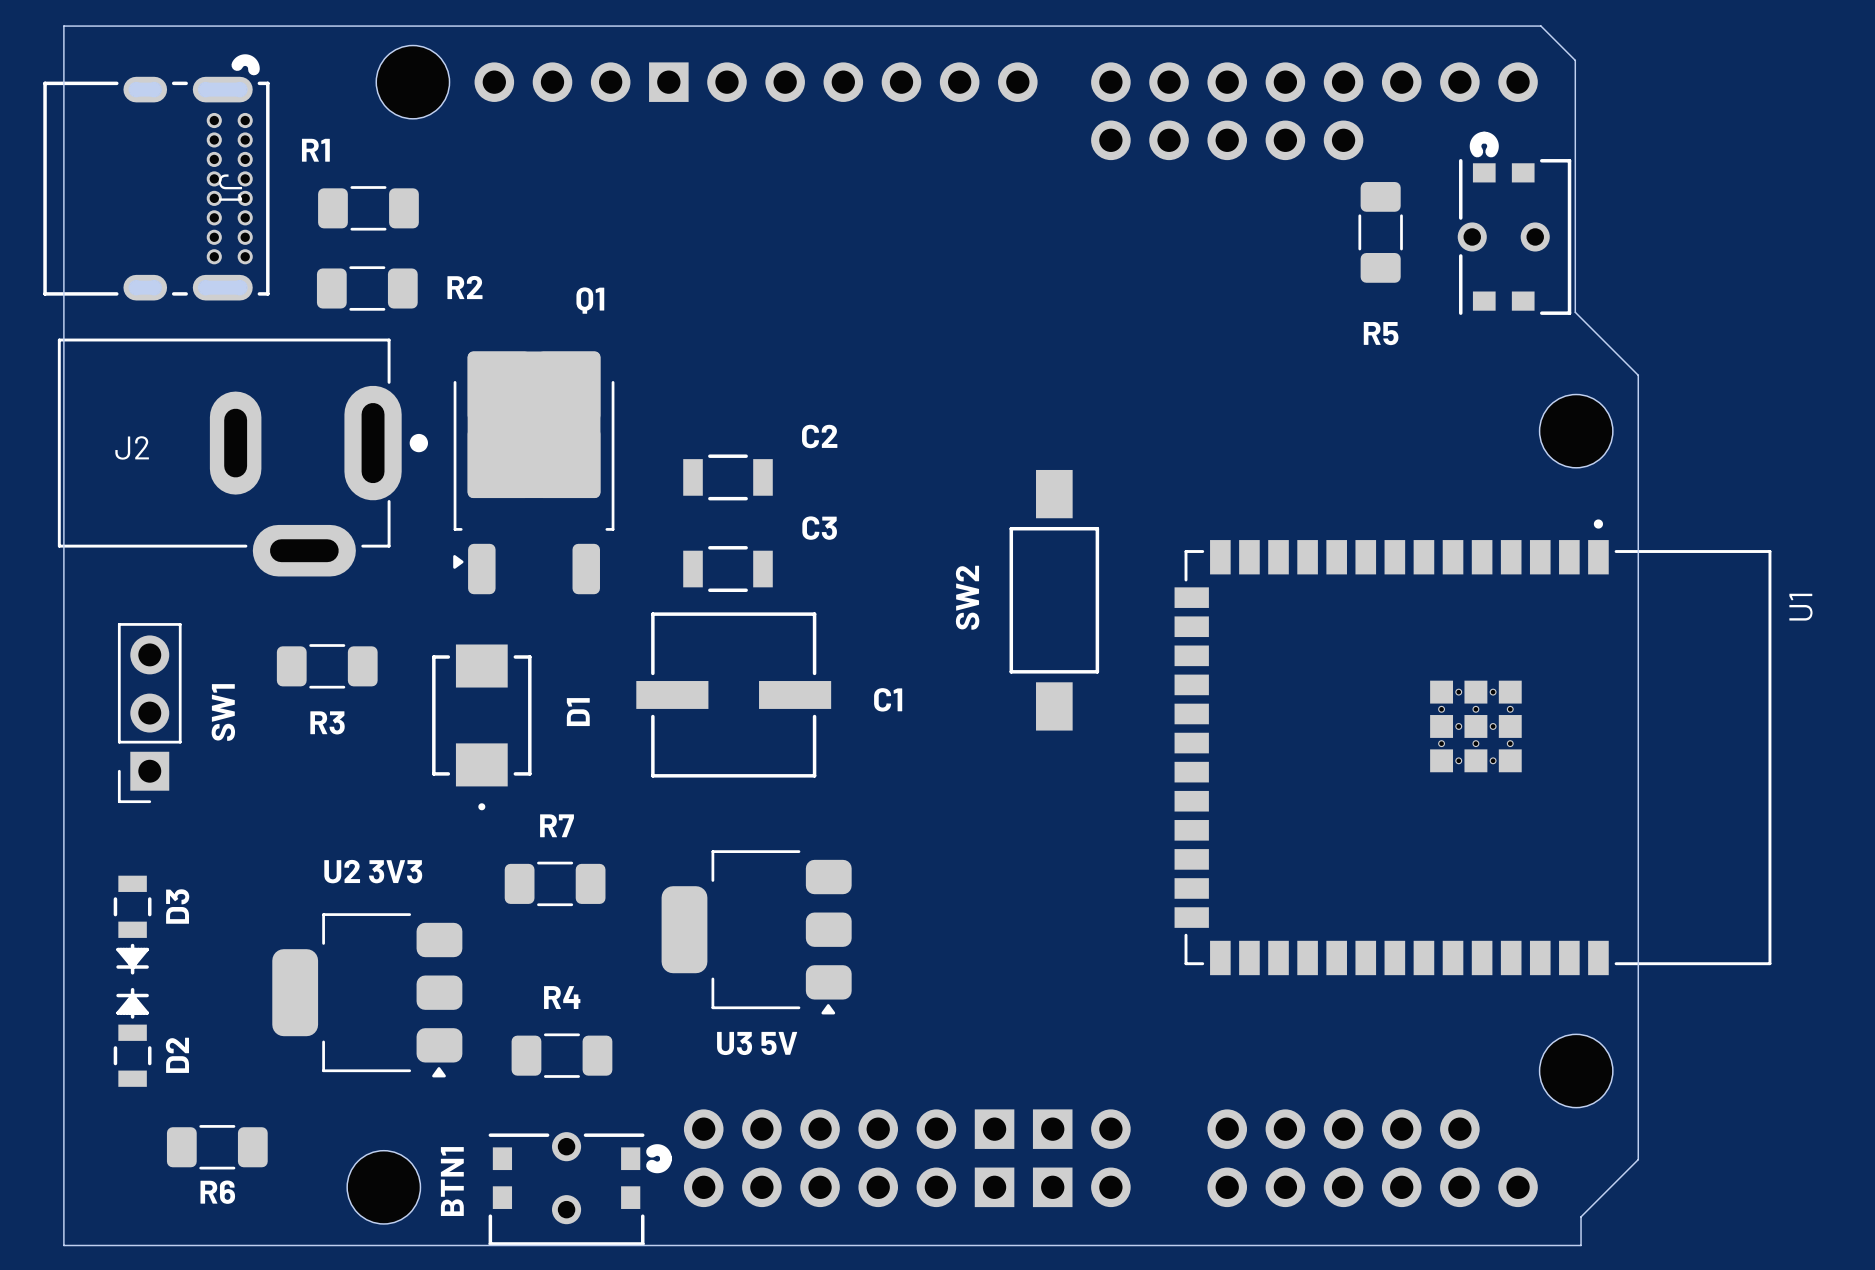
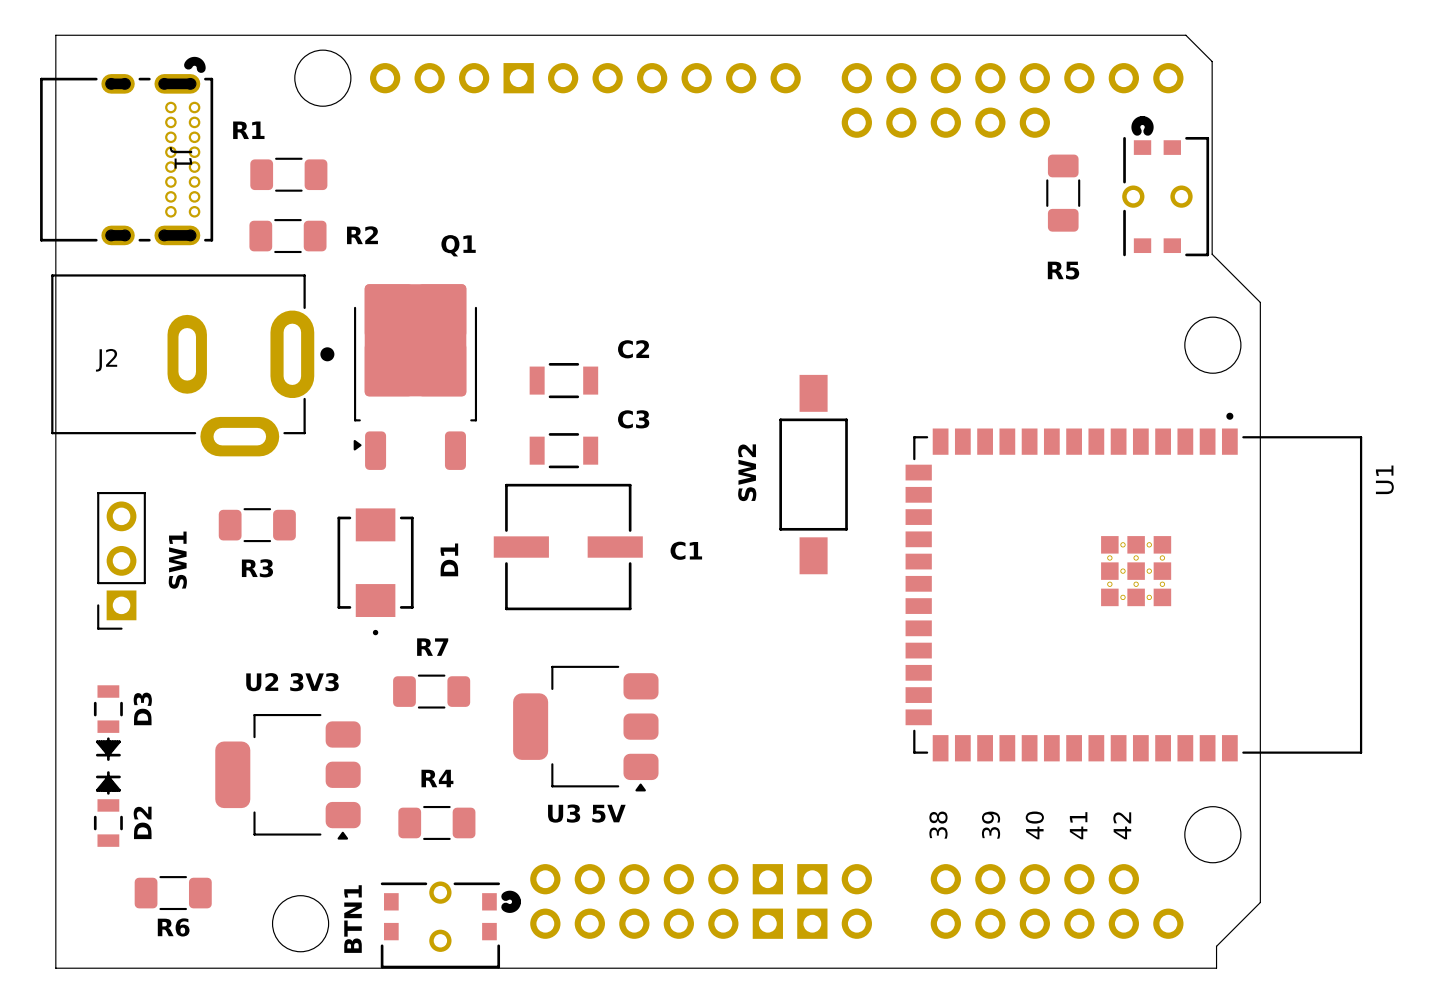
text: none -> 40 (1034, 825)
text: none -> 42 (1122, 825)
text: none -> 38 (938, 825)
text: none -> 39 (991, 825)
text: none -> 41 (1078, 825)

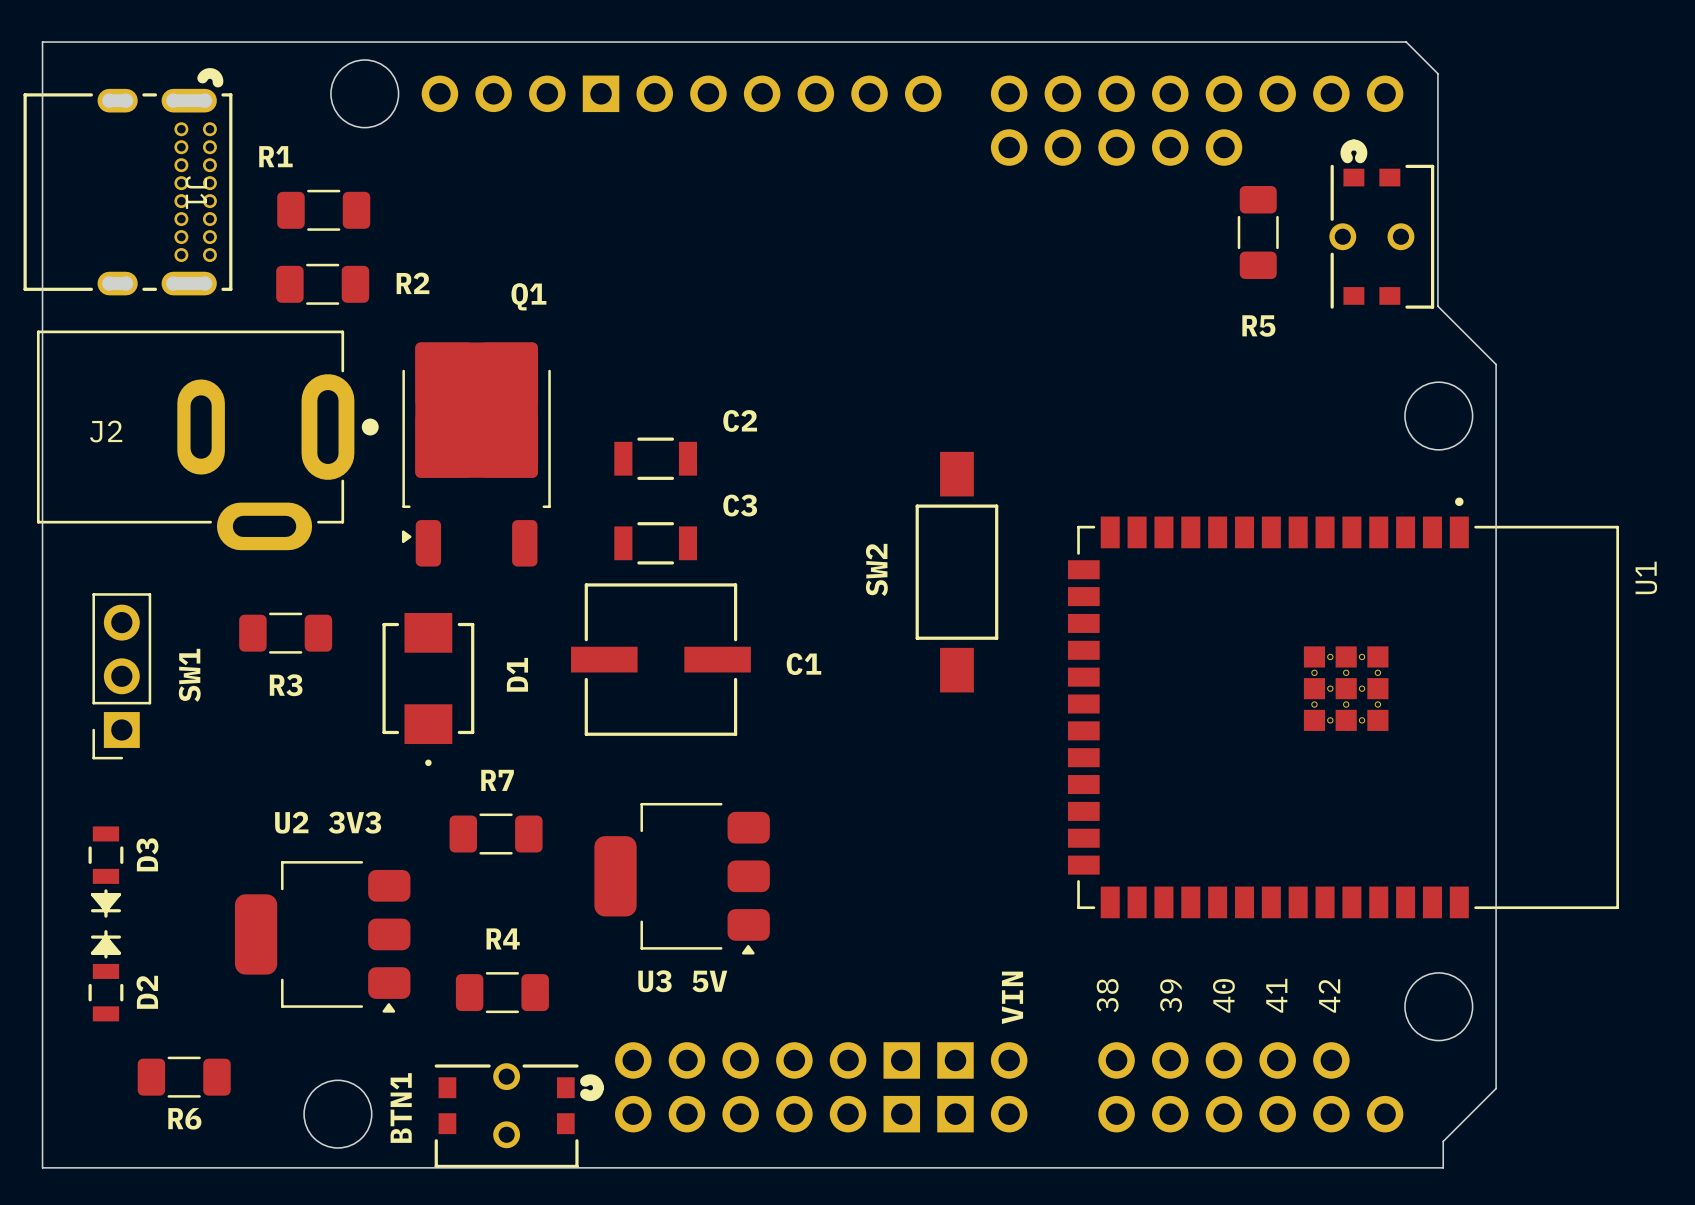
text: none -> VIN (1012, 997)

